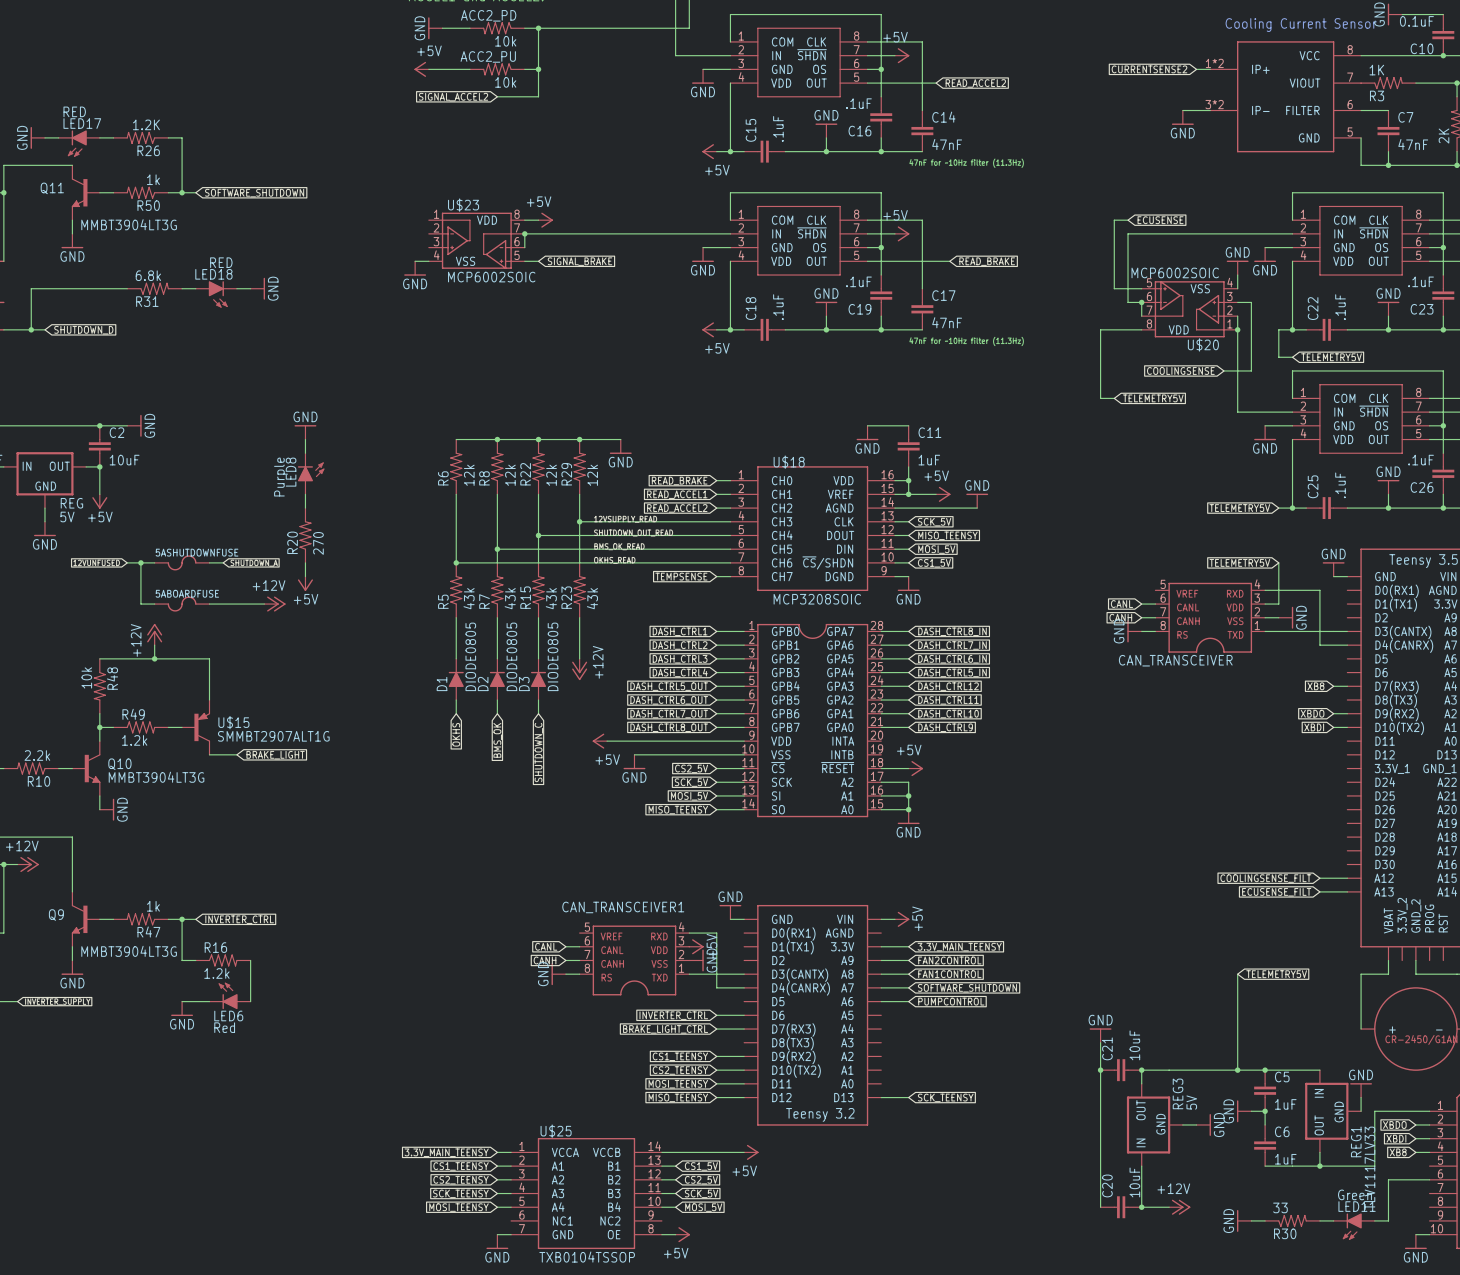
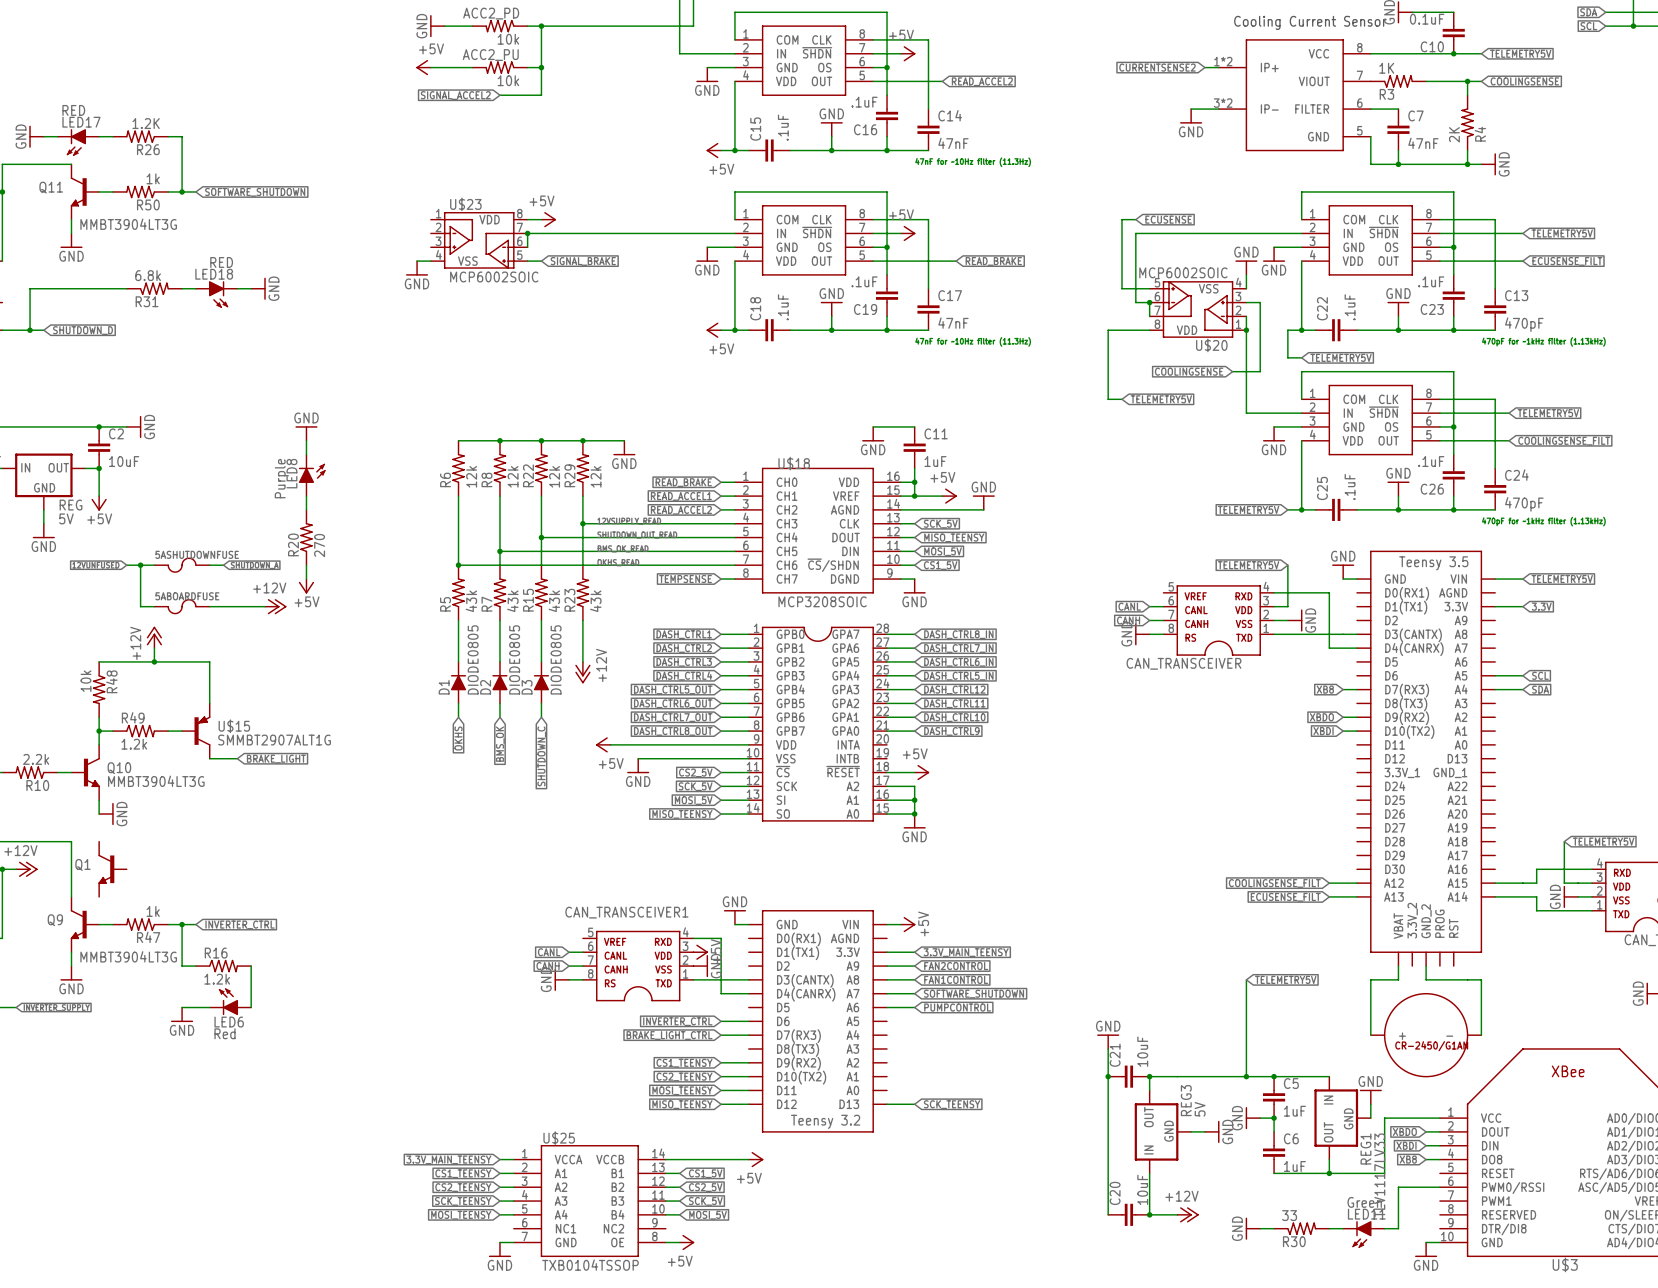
Q1: none -> (112, 869)

